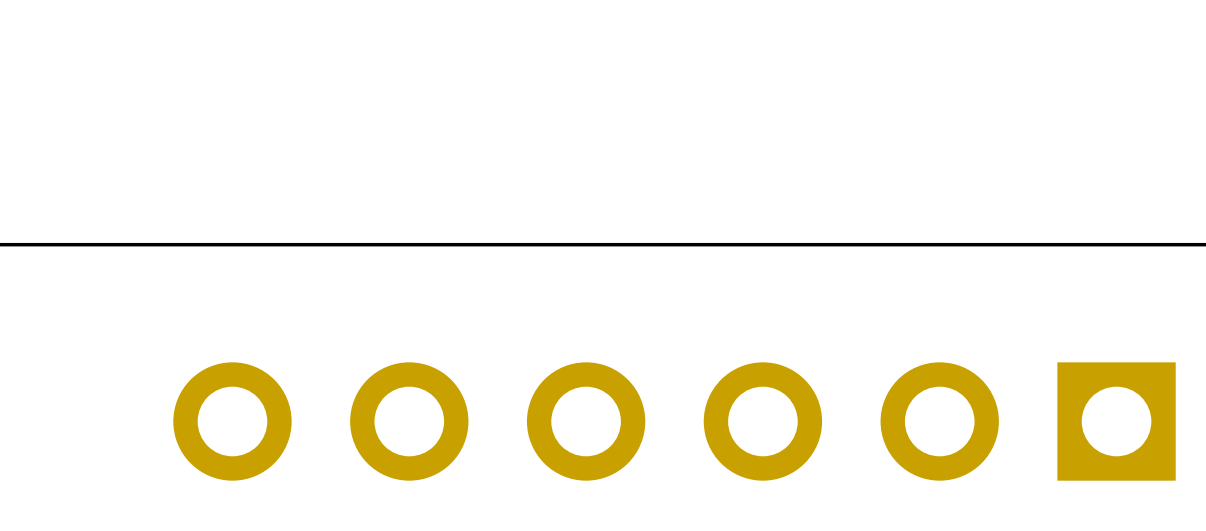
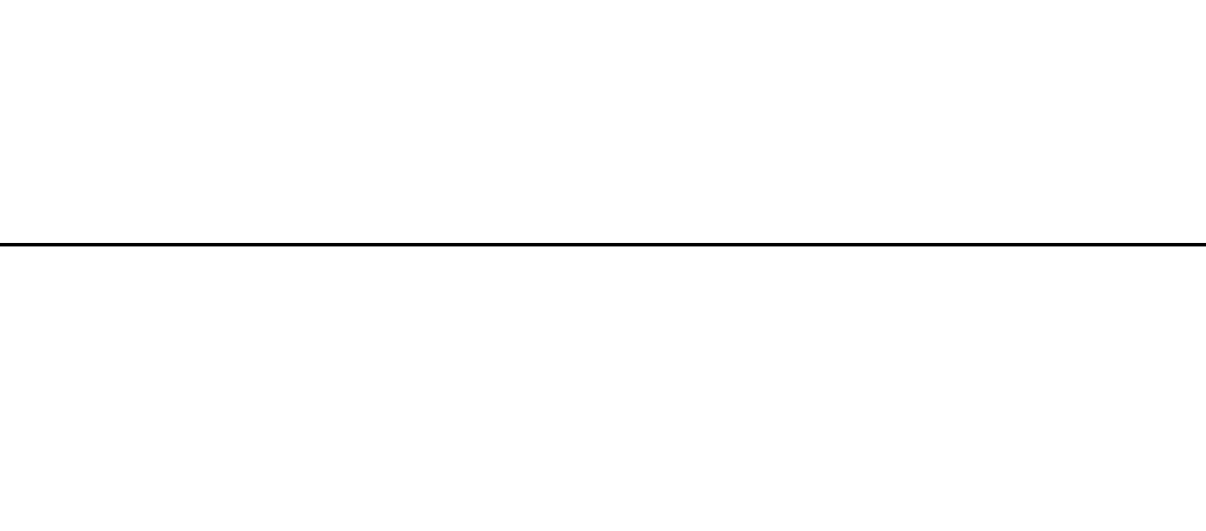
part: (674, 421) -> none

